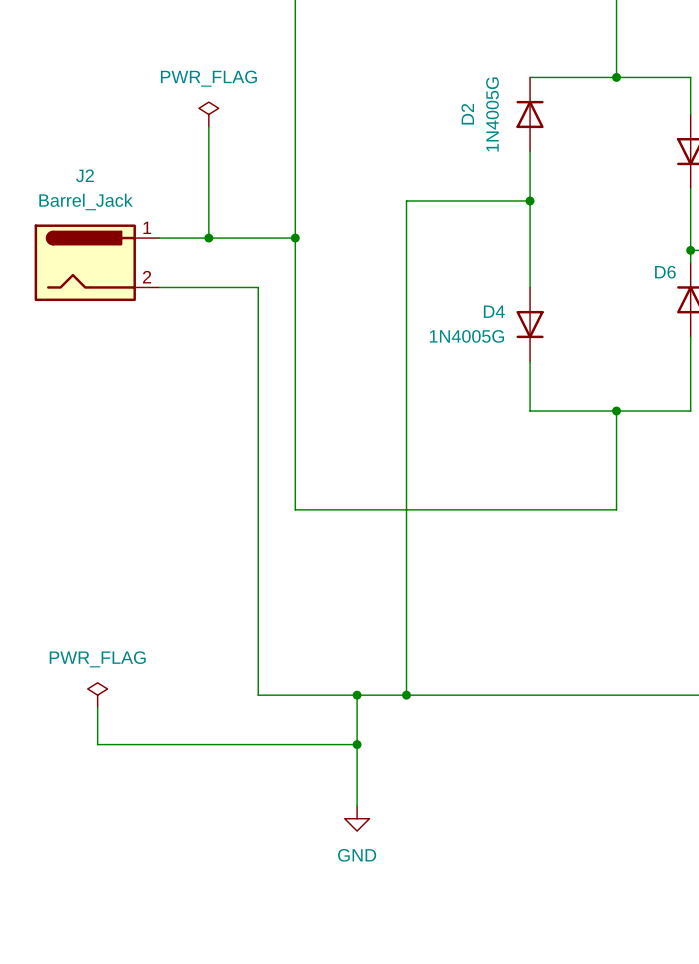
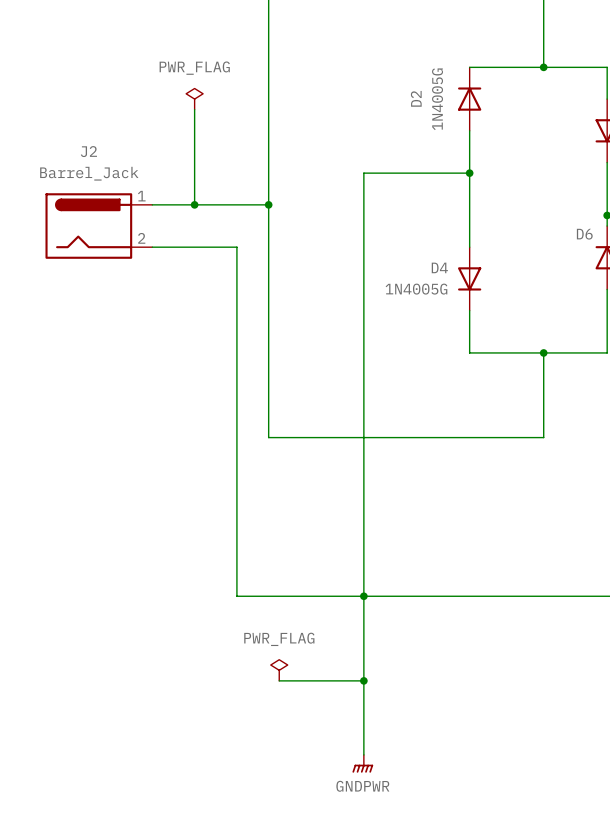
power symbol position: PWR_FLAG (97, 695) -> PWR_FLAG (279, 670)
wire: (357, 695) (357, 806) -> none
junction: (357, 695) -> none
wire: none -> (363, 596) (363, 754)
wire: (97, 707) (97, 744) (357, 744) -> none
junction: (357, 744) -> none
wire: none -> (279, 680) (363, 680)
junction: none -> (363, 680)
power symbol: GND (357, 818) -> none
power symbol: none -> GNDPWR (362, 763)

